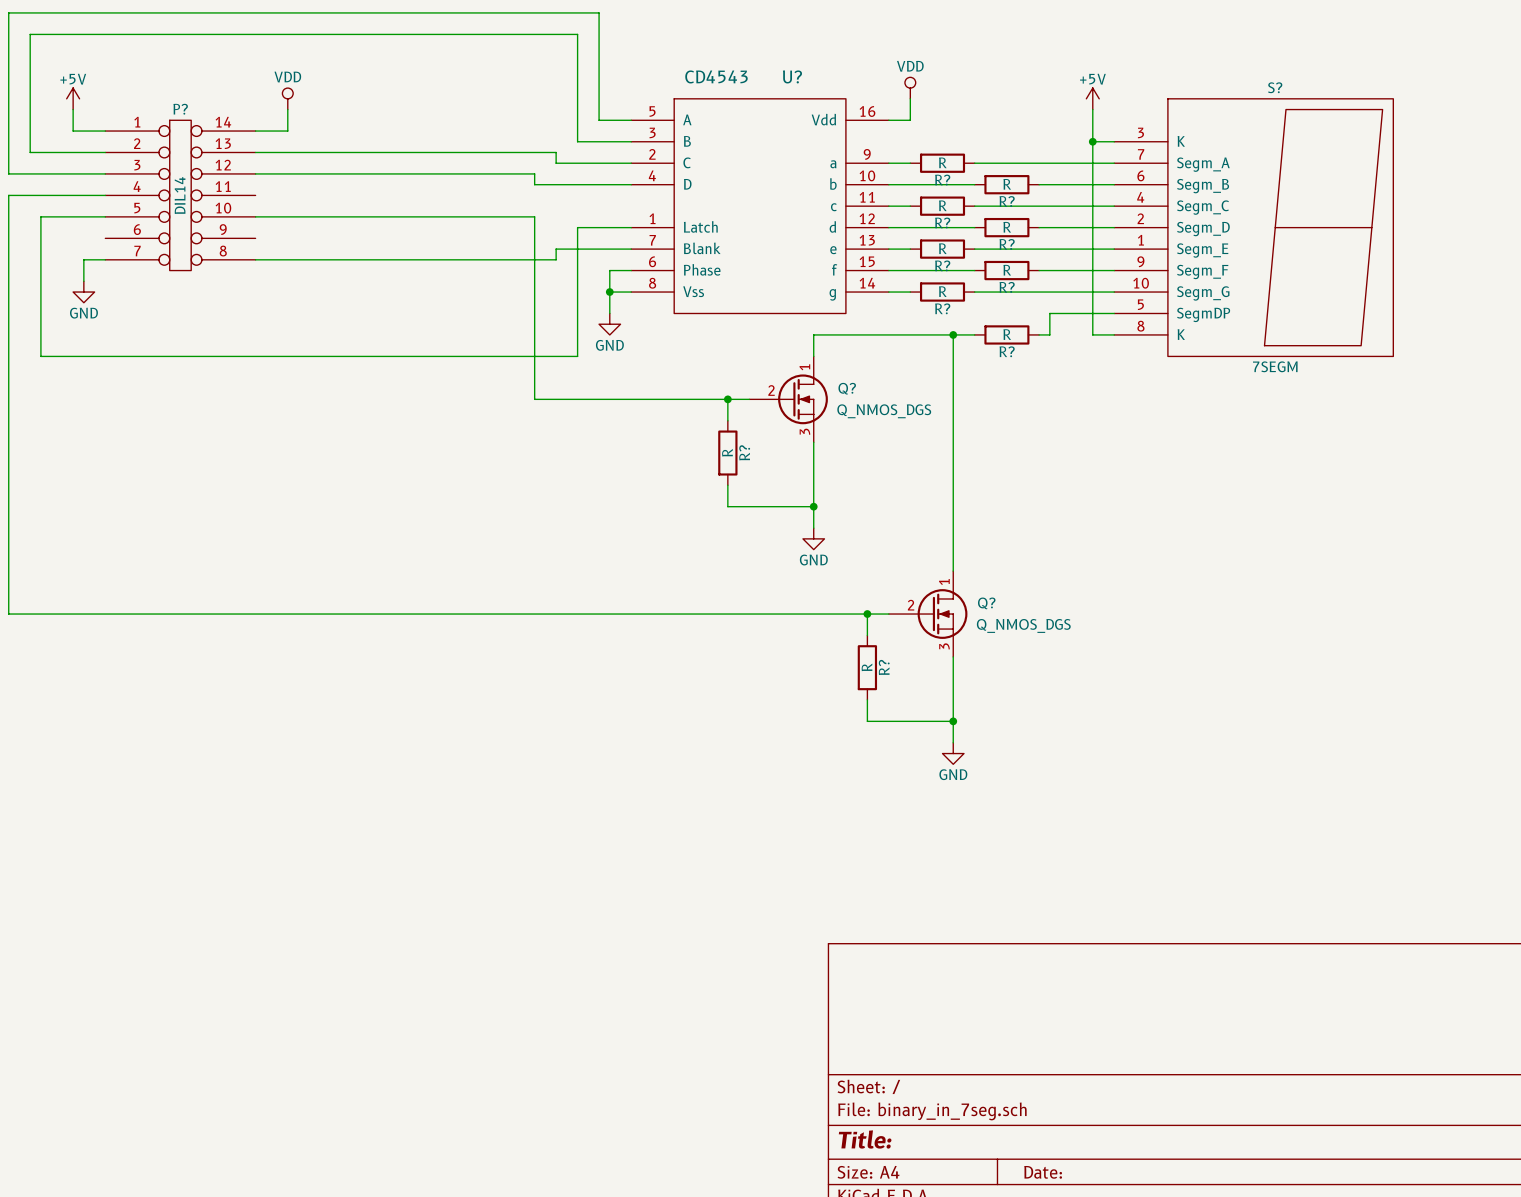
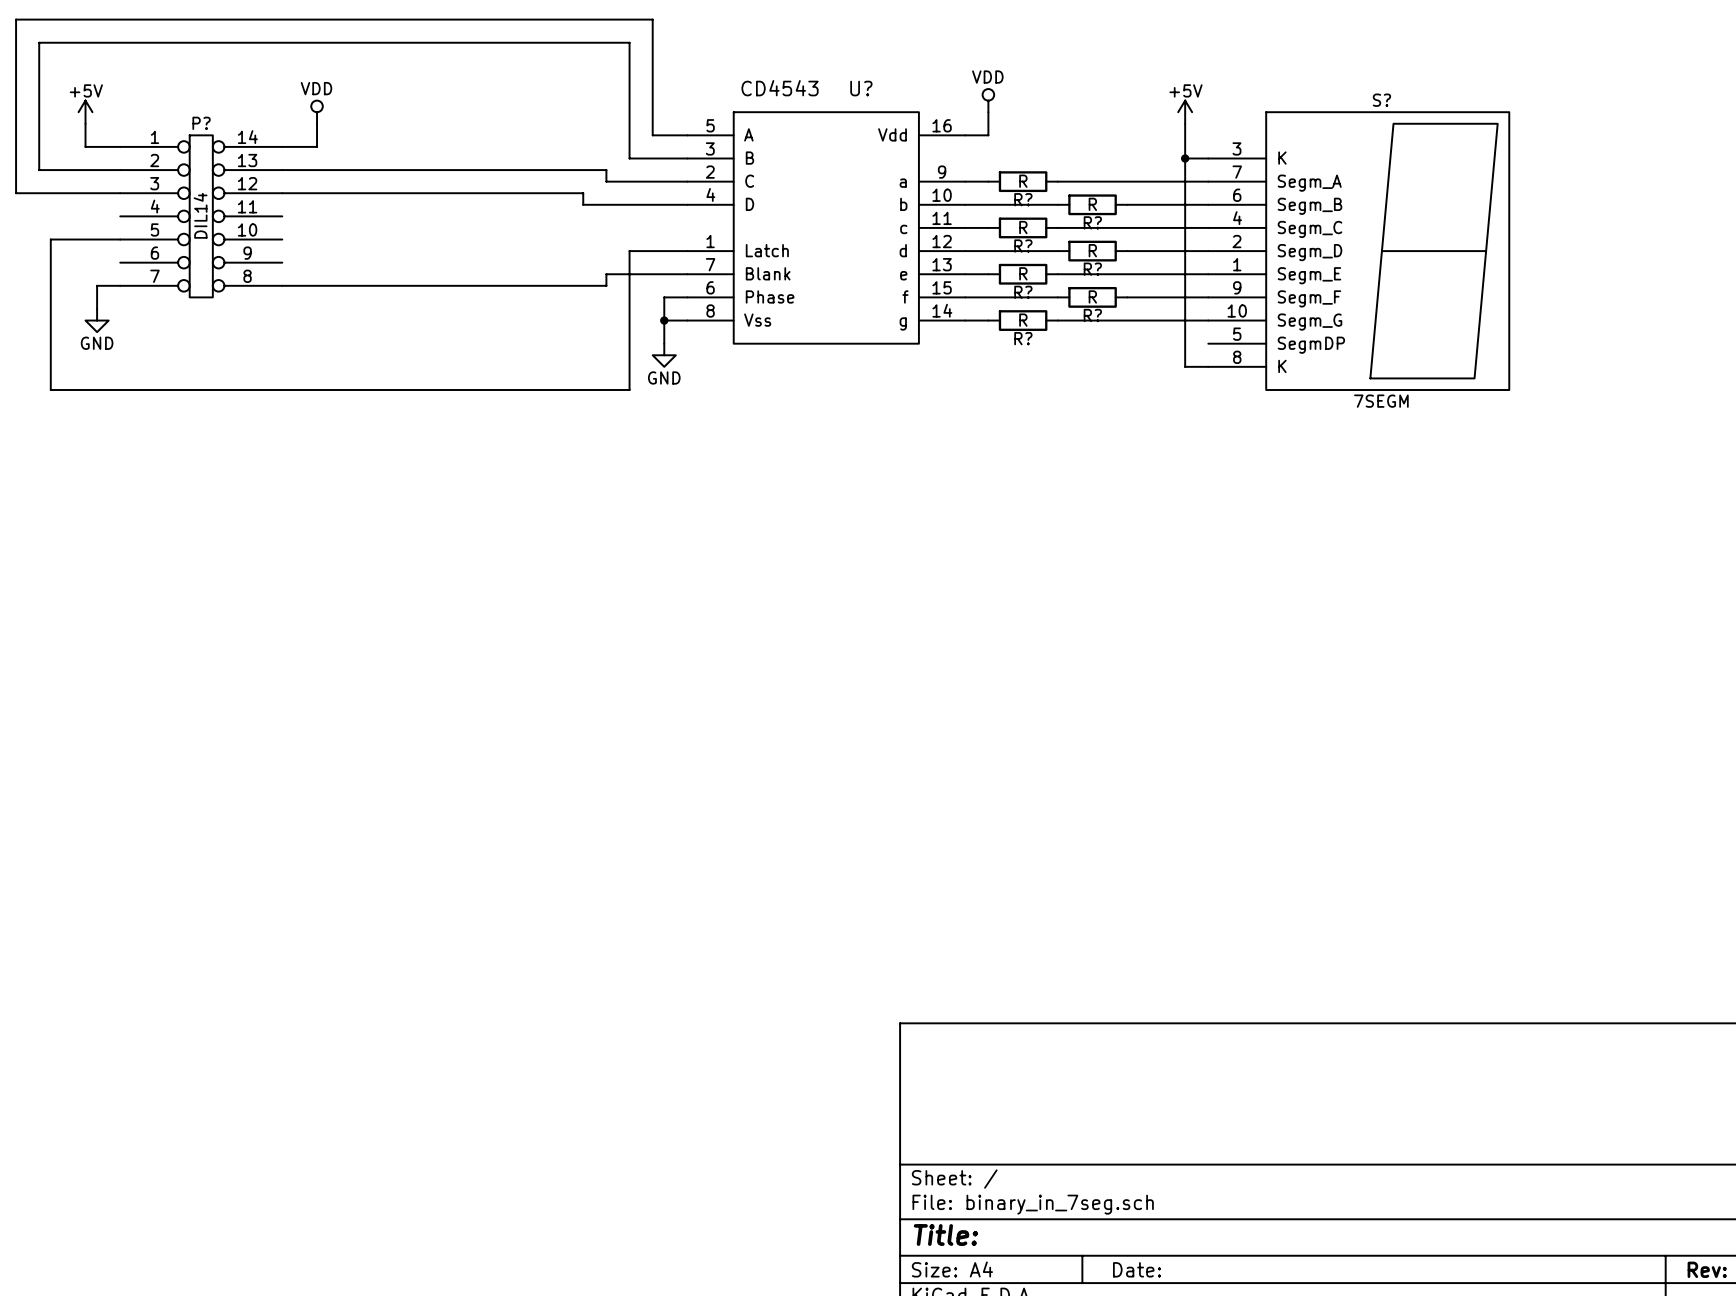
wire: (105, 195) (8, 195) (8, 614) (888, 614) -> none
wire: (255, 216) (534, 216) (534, 399) (749, 399) -> none
wire: (1114, 313) (1049, 313) (1049, 334) (1039, 334) -> none
wire: (953, 334) (953, 571) -> none
junction: (953, 334) -> none
wire: (974, 334) (813, 334) (813, 356) -> none
R?: R (1006, 334) -> none
wire: (727, 399) (727, 420) -> none
junction: (727, 399) -> none
Q?: Q_NMOS_DGS (788, 399) -> none
wire: (813, 442) (813, 528) -> none
R?: R (727, 453) -> none
wire: (727, 485) (727, 506) (813, 506) -> none
junction: (813, 506) -> none
power symbol: GND (813, 538) -> none
wire: (867, 614) (867, 635) -> none
junction: (867, 614) -> none
Q?: Q_NMOS_DGS (928, 614) -> none
wire: (953, 656) (953, 742) -> none
R?: R (867, 667) -> none
wire: (867, 699) (867, 721) (953, 721) -> none
junction: (953, 721) -> none
power symbol: GND (953, 753) -> none

